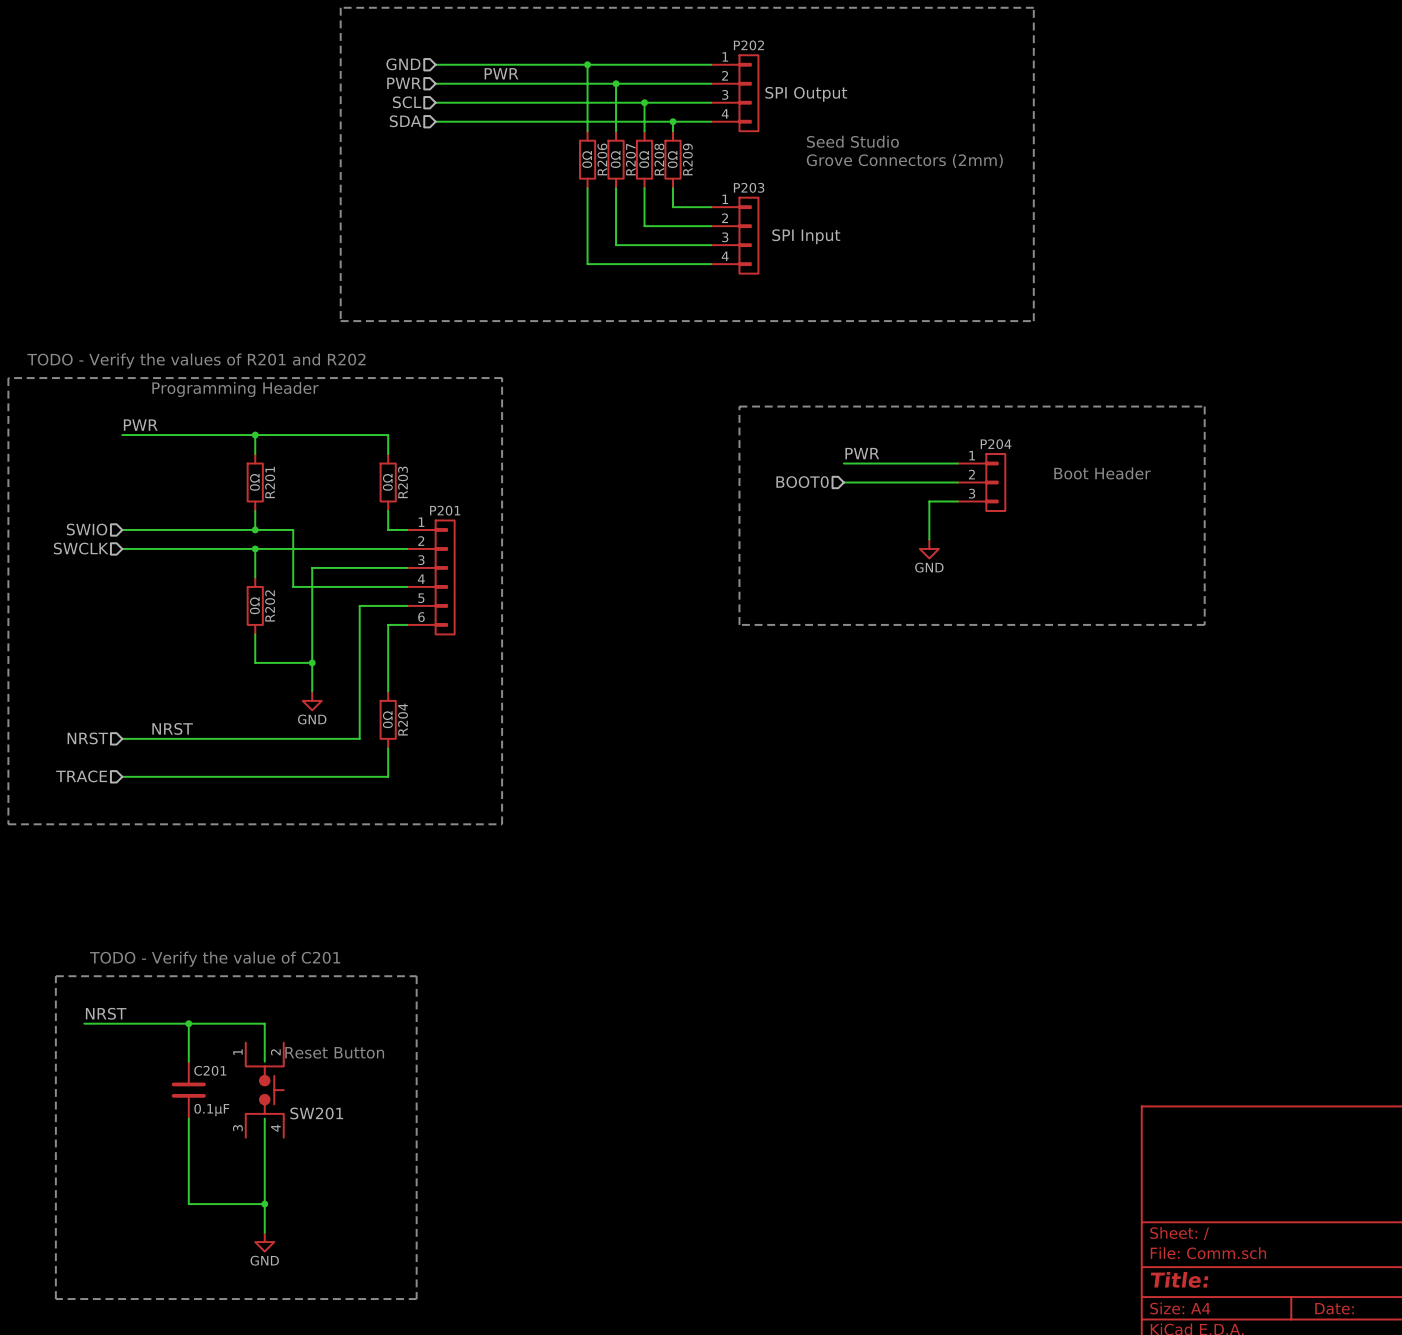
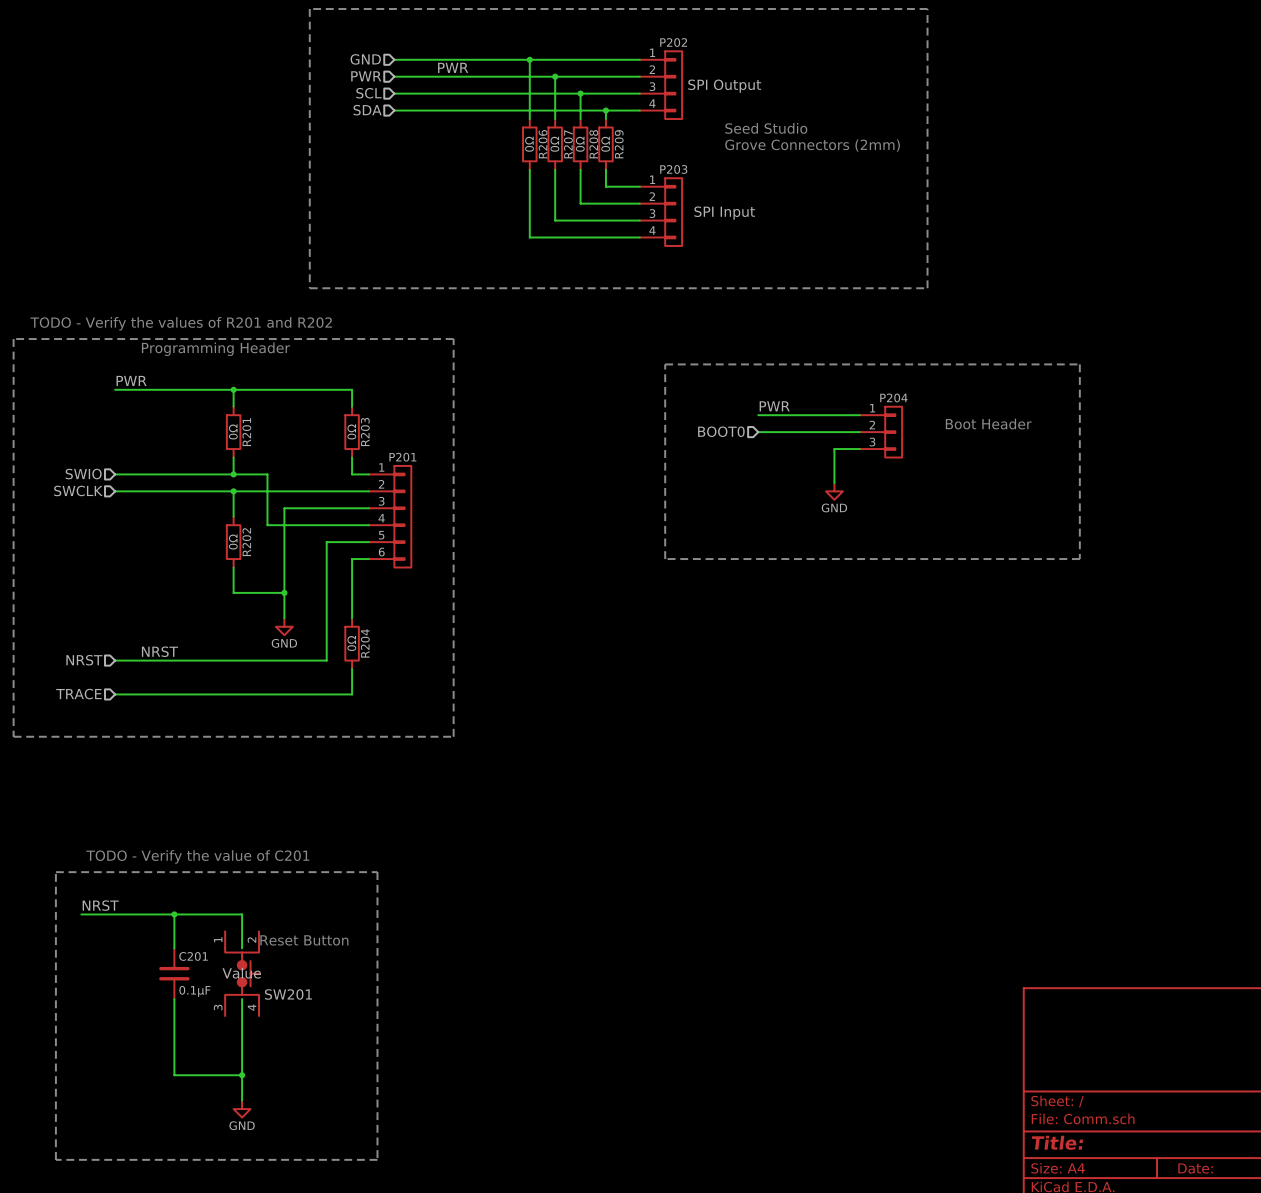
SW201 text: none -> Value (241, 973)

